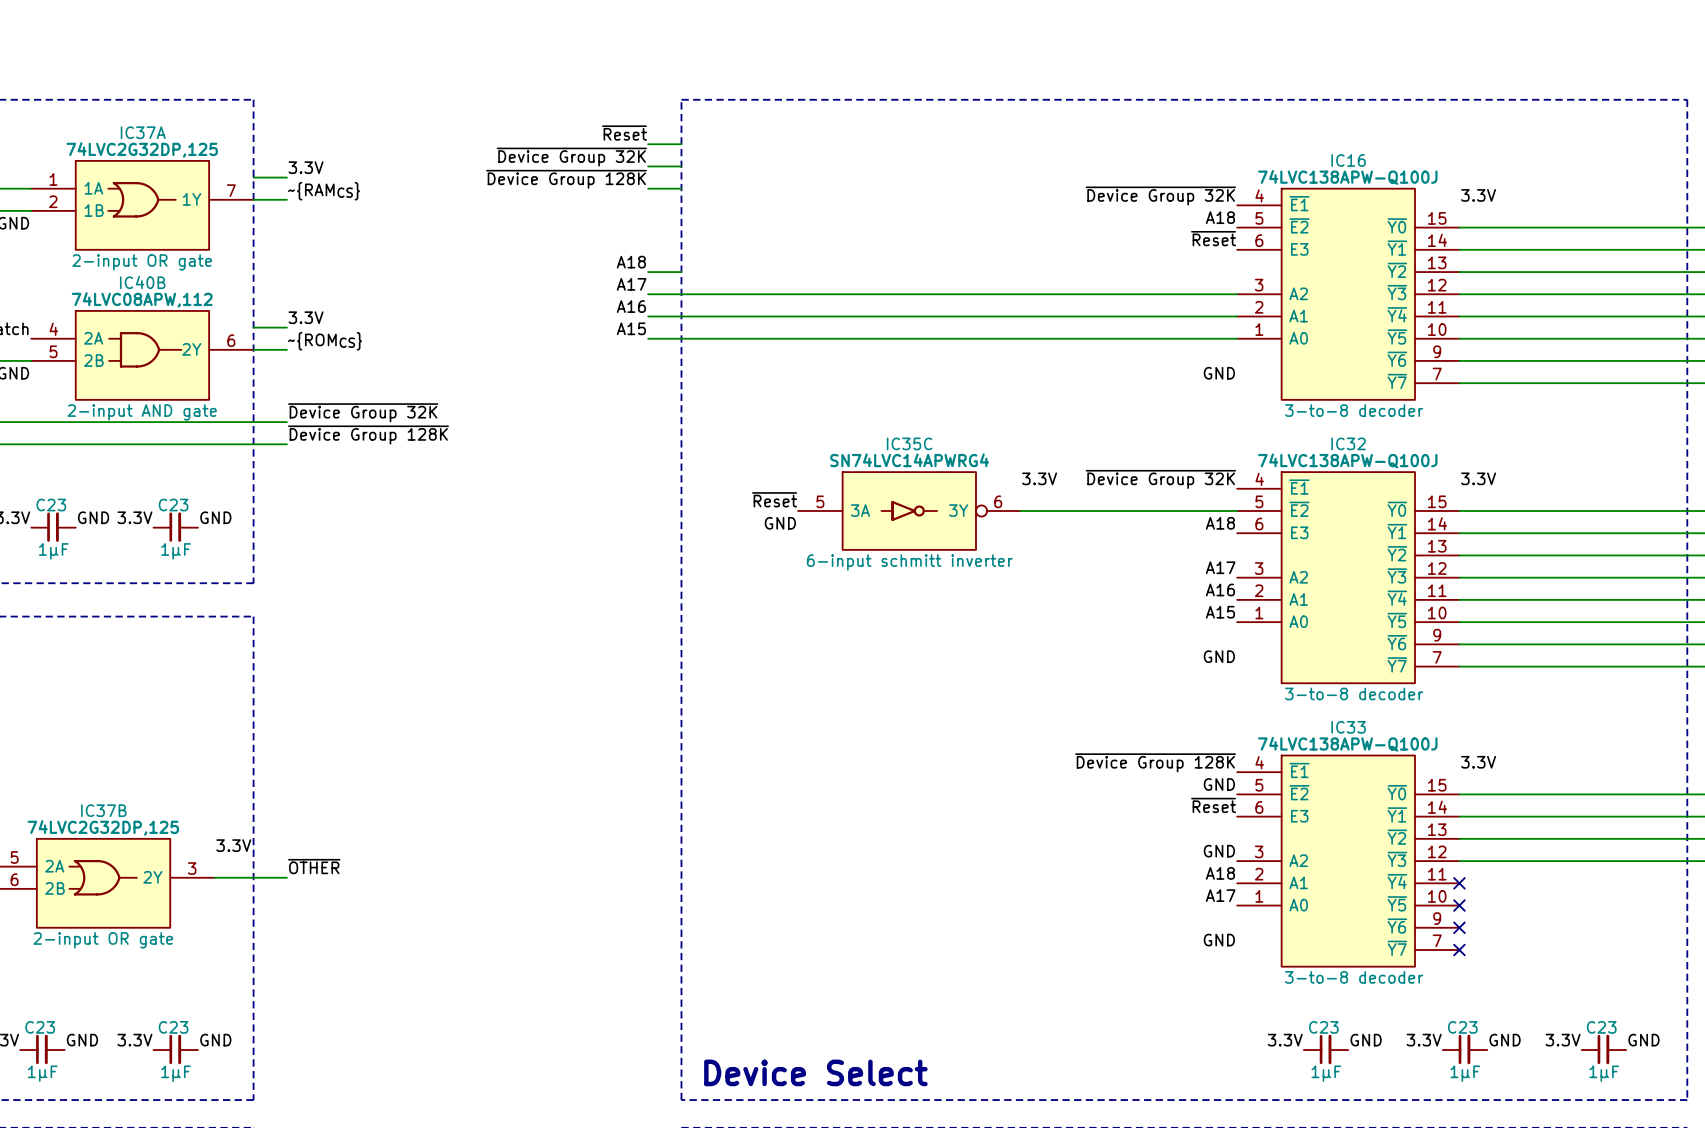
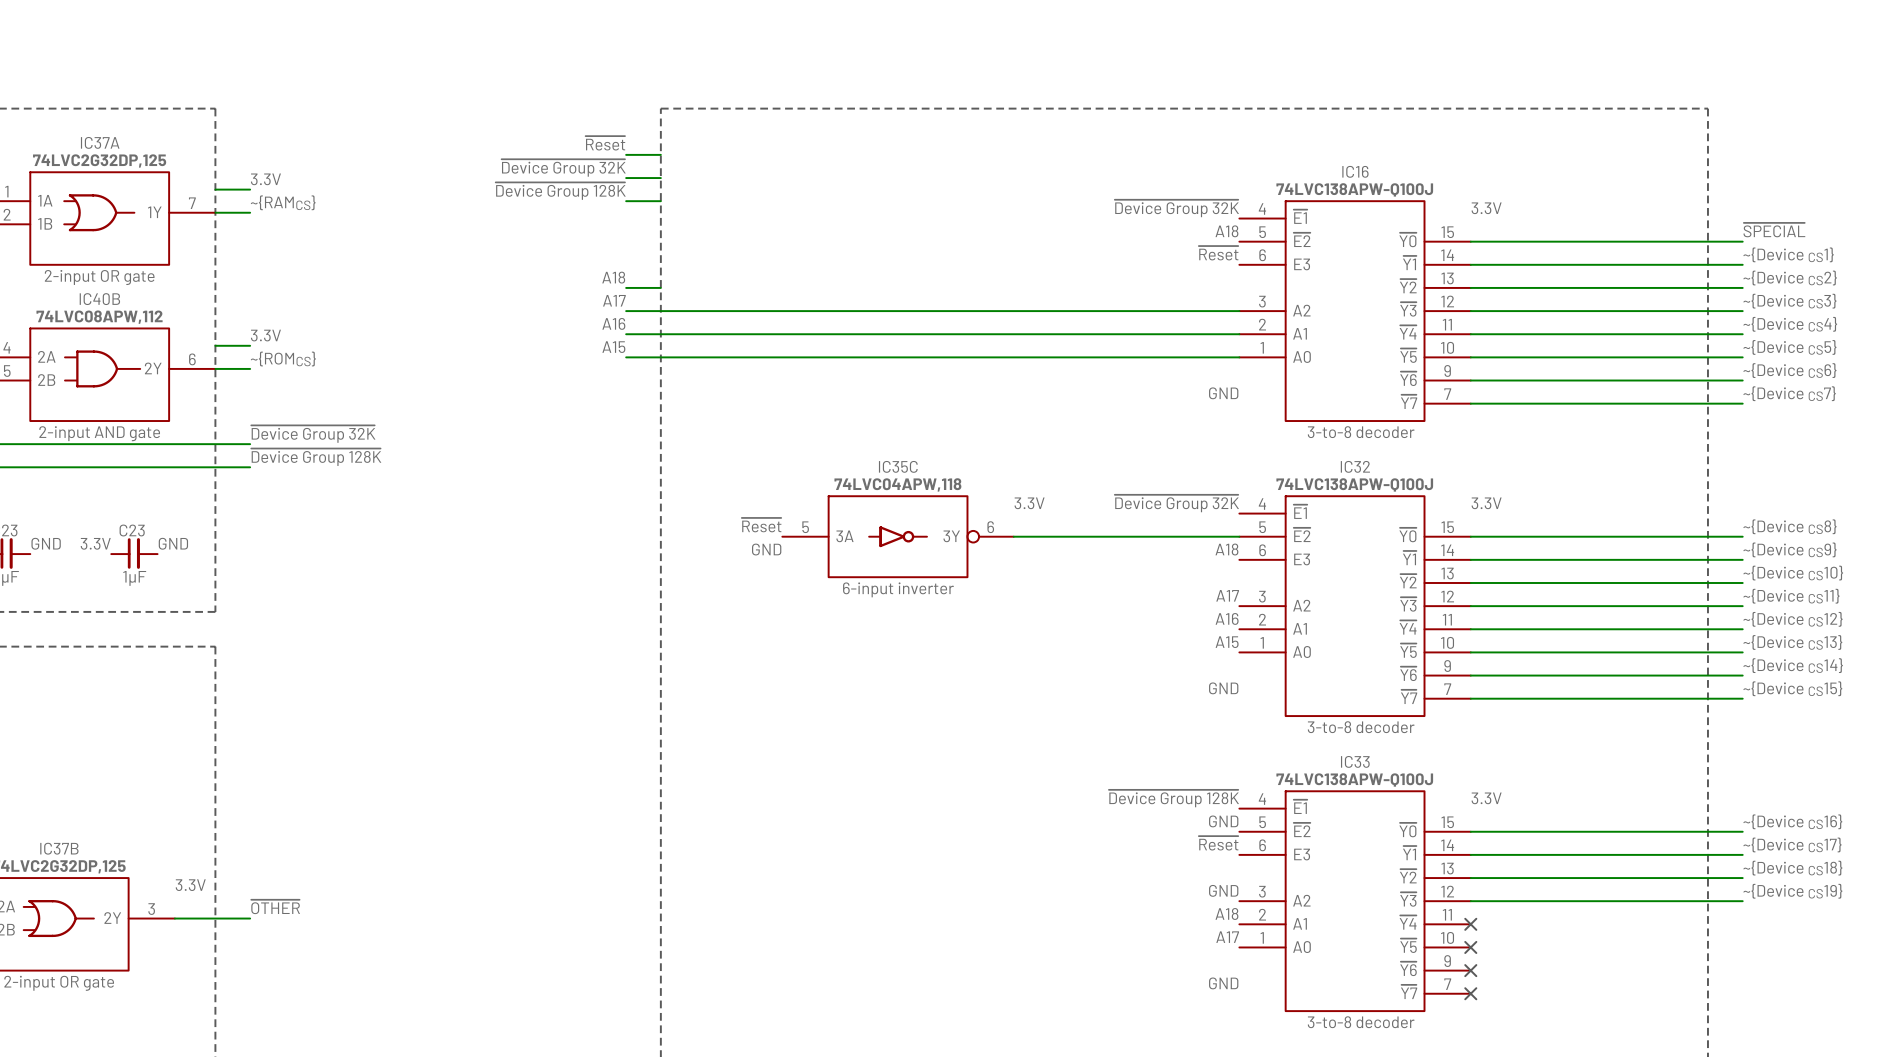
IC35C value: SN74LVC14APWRG4 (909, 460) -> 74LVC04APW,118 (897, 484)
IC35C text: 6-input schmitt inverter (909, 562) -> 6-input inverter (898, 589)

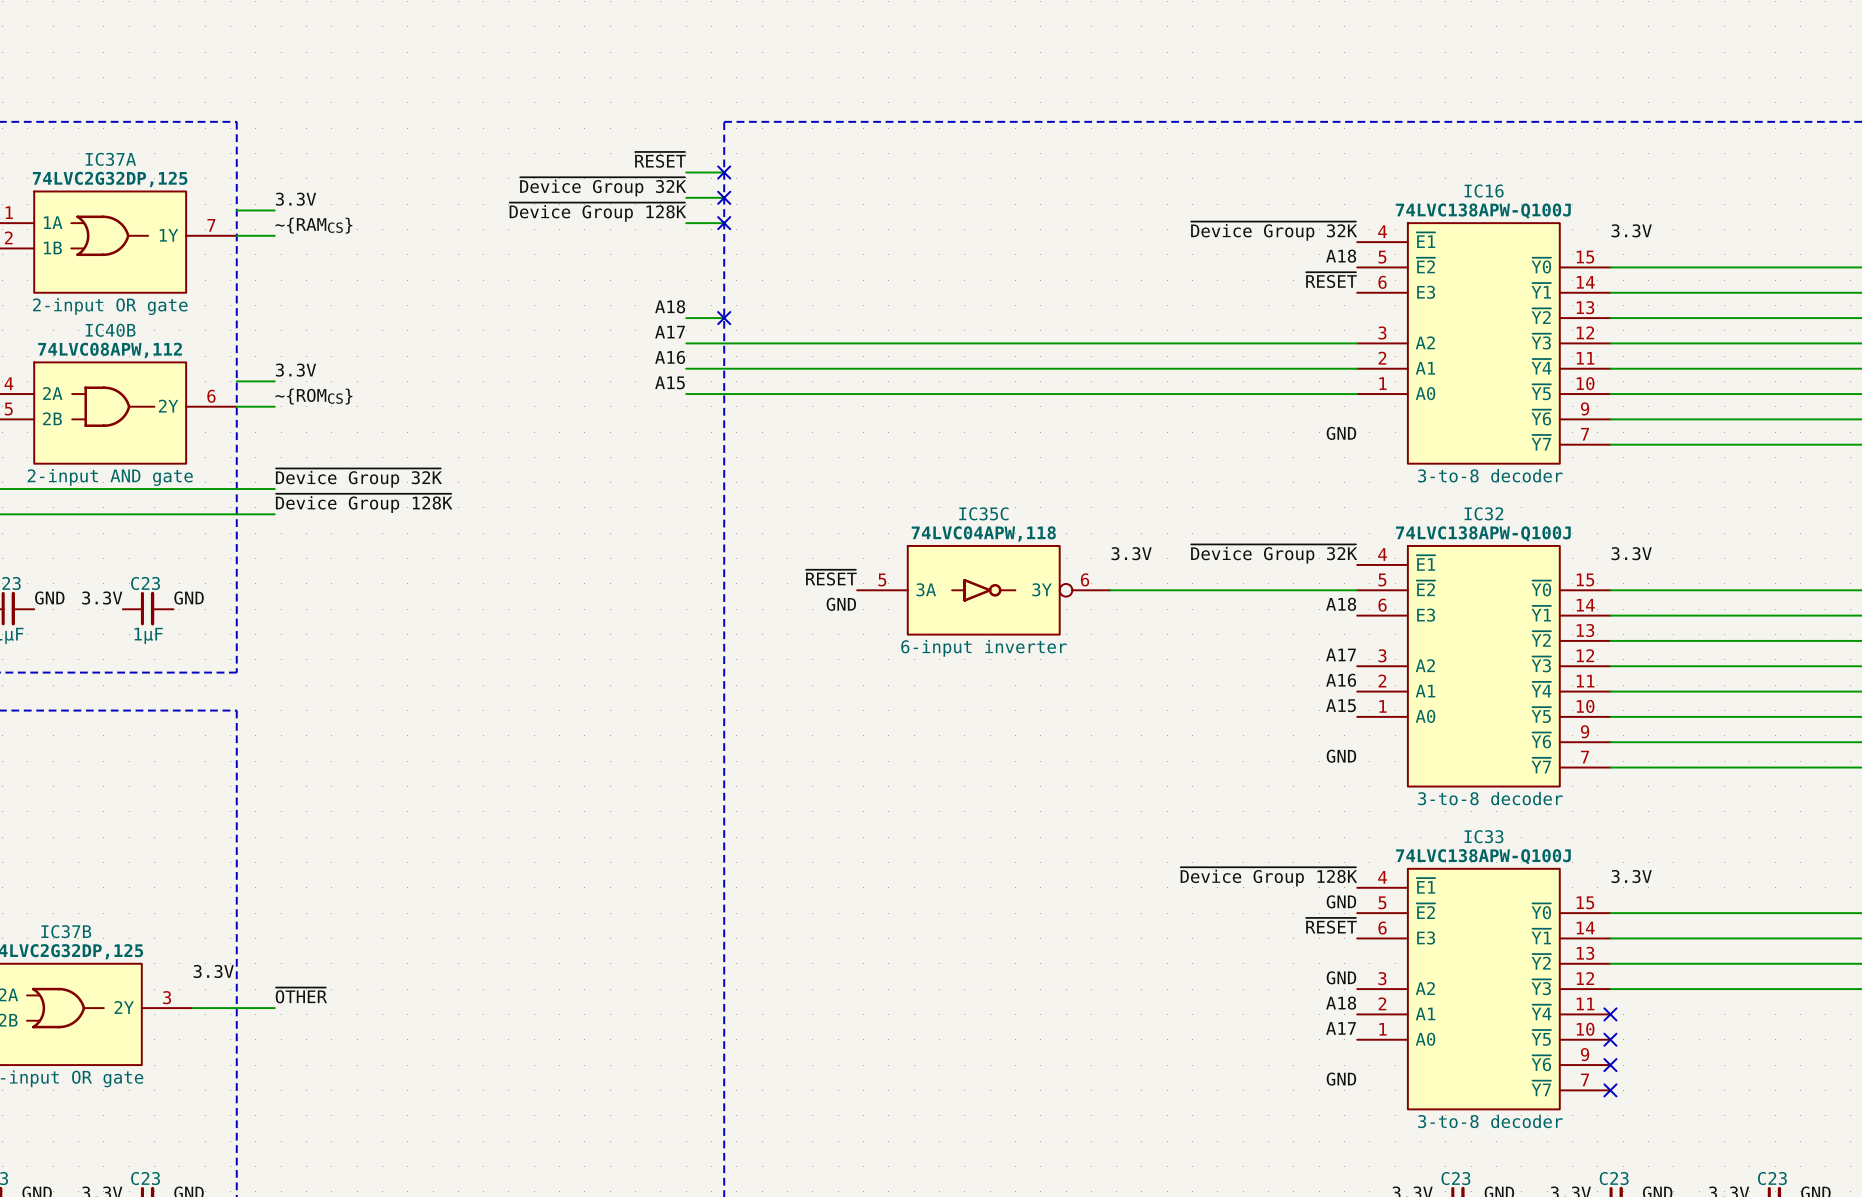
label: ~{Reset} (605, 143) -> ~{RESET} (660, 159)
no-connect mark: none -> (724, 172)
no-connect mark: none -> (724, 197)
no-connect mark: none -> (724, 223)
label: ~{Reset} (1218, 253) -> ~{RESET} (1331, 280)
no-connect mark: none -> (724, 318)
label: ~{Reset} (761, 525) -> ~{RESET} (831, 577)
label: ~{Reset} (1218, 843) -> ~{RESET} (1331, 925)

